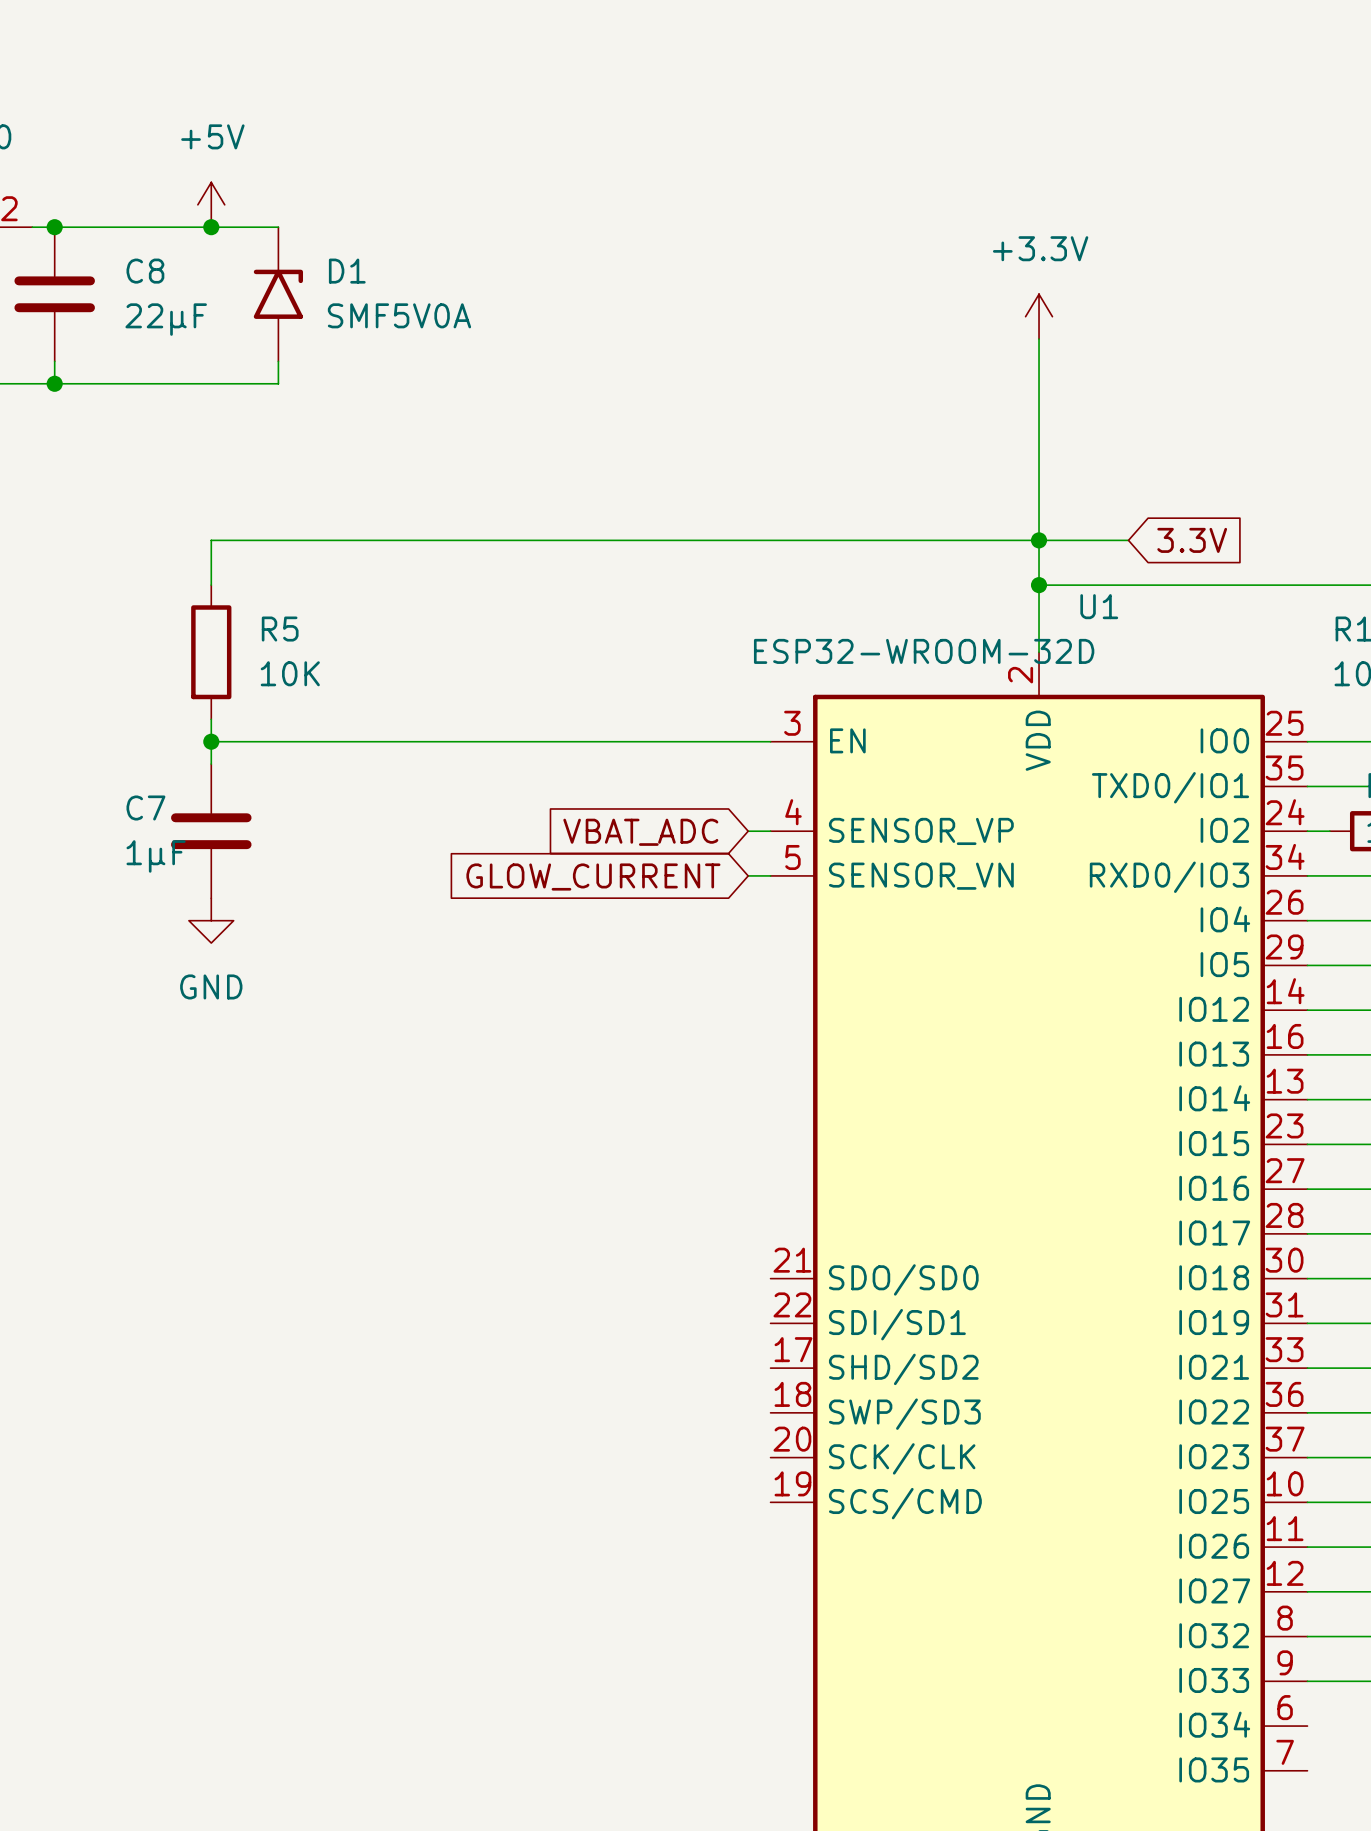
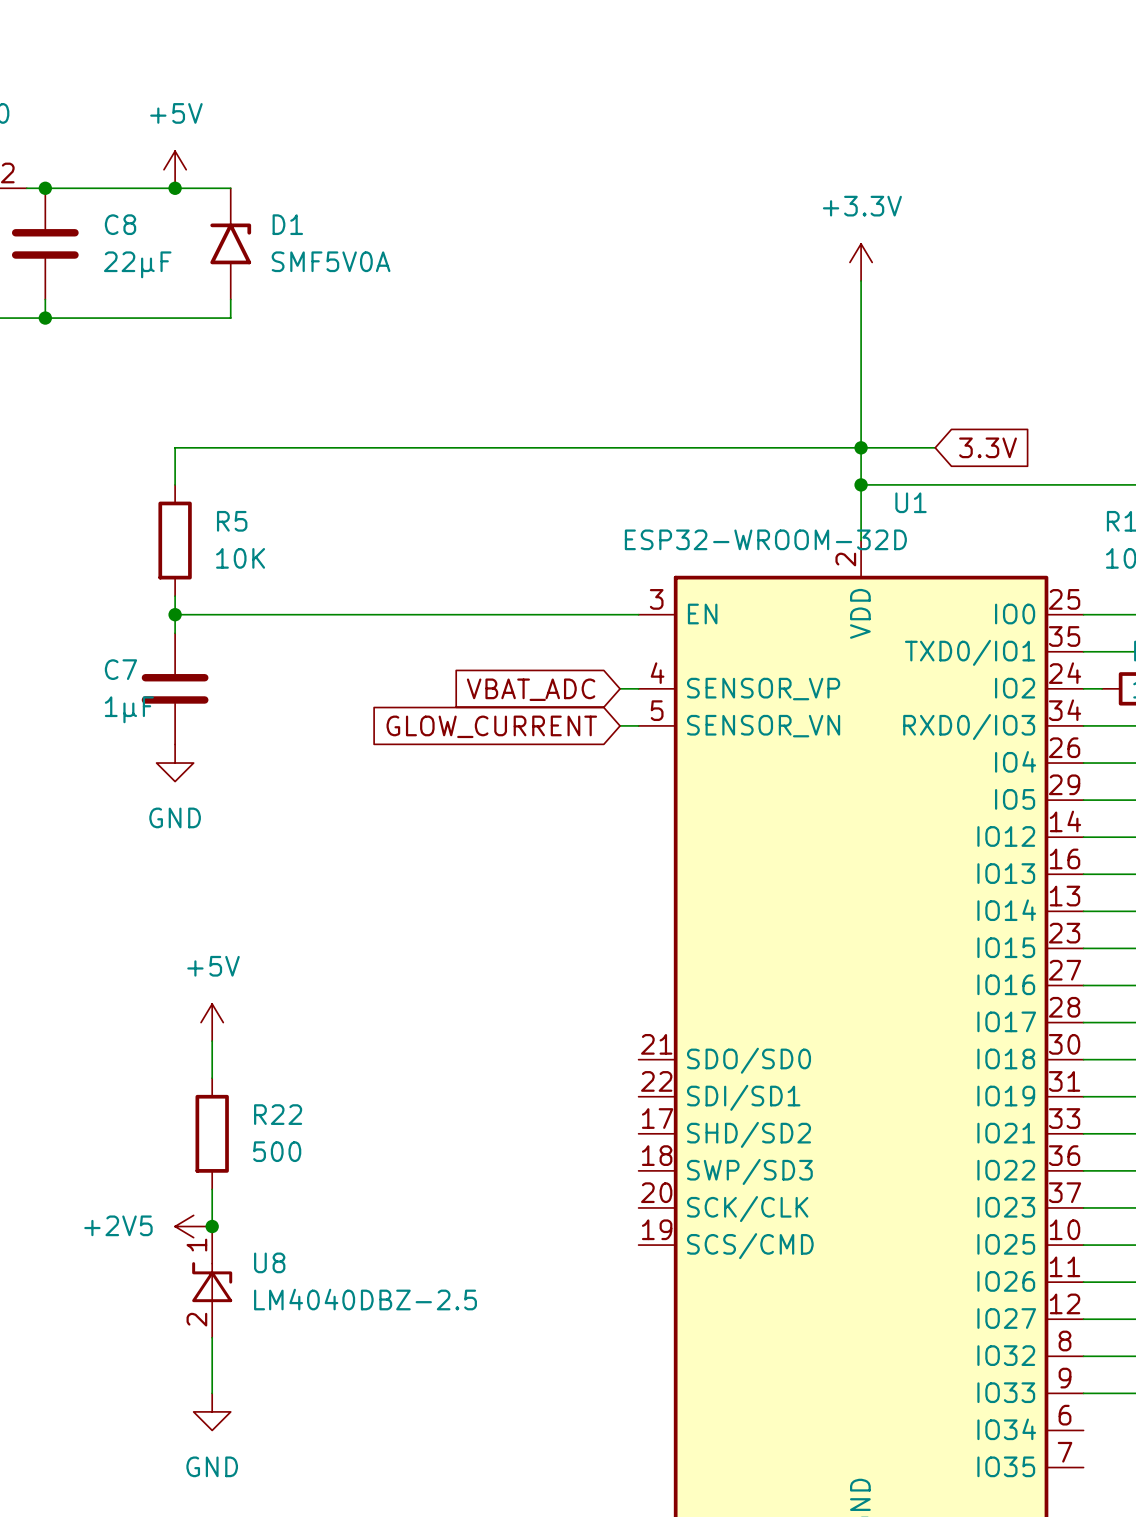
power symbol: none -> +5V (212, 1022)
wire: none -> (212, 1041) (212, 1078)
R22: none -> 500 (212, 1133)
wire: none -> (212, 1189) (212, 1226)
power symbol: none -> +2V5 (193, 1226)
junction: none -> (212, 1226)
U8: none -> LM4040DBZ-2.5 (212, 1282)
wire: none -> (212, 1337) (212, 1393)
power symbol: none -> GND (212, 1411)

